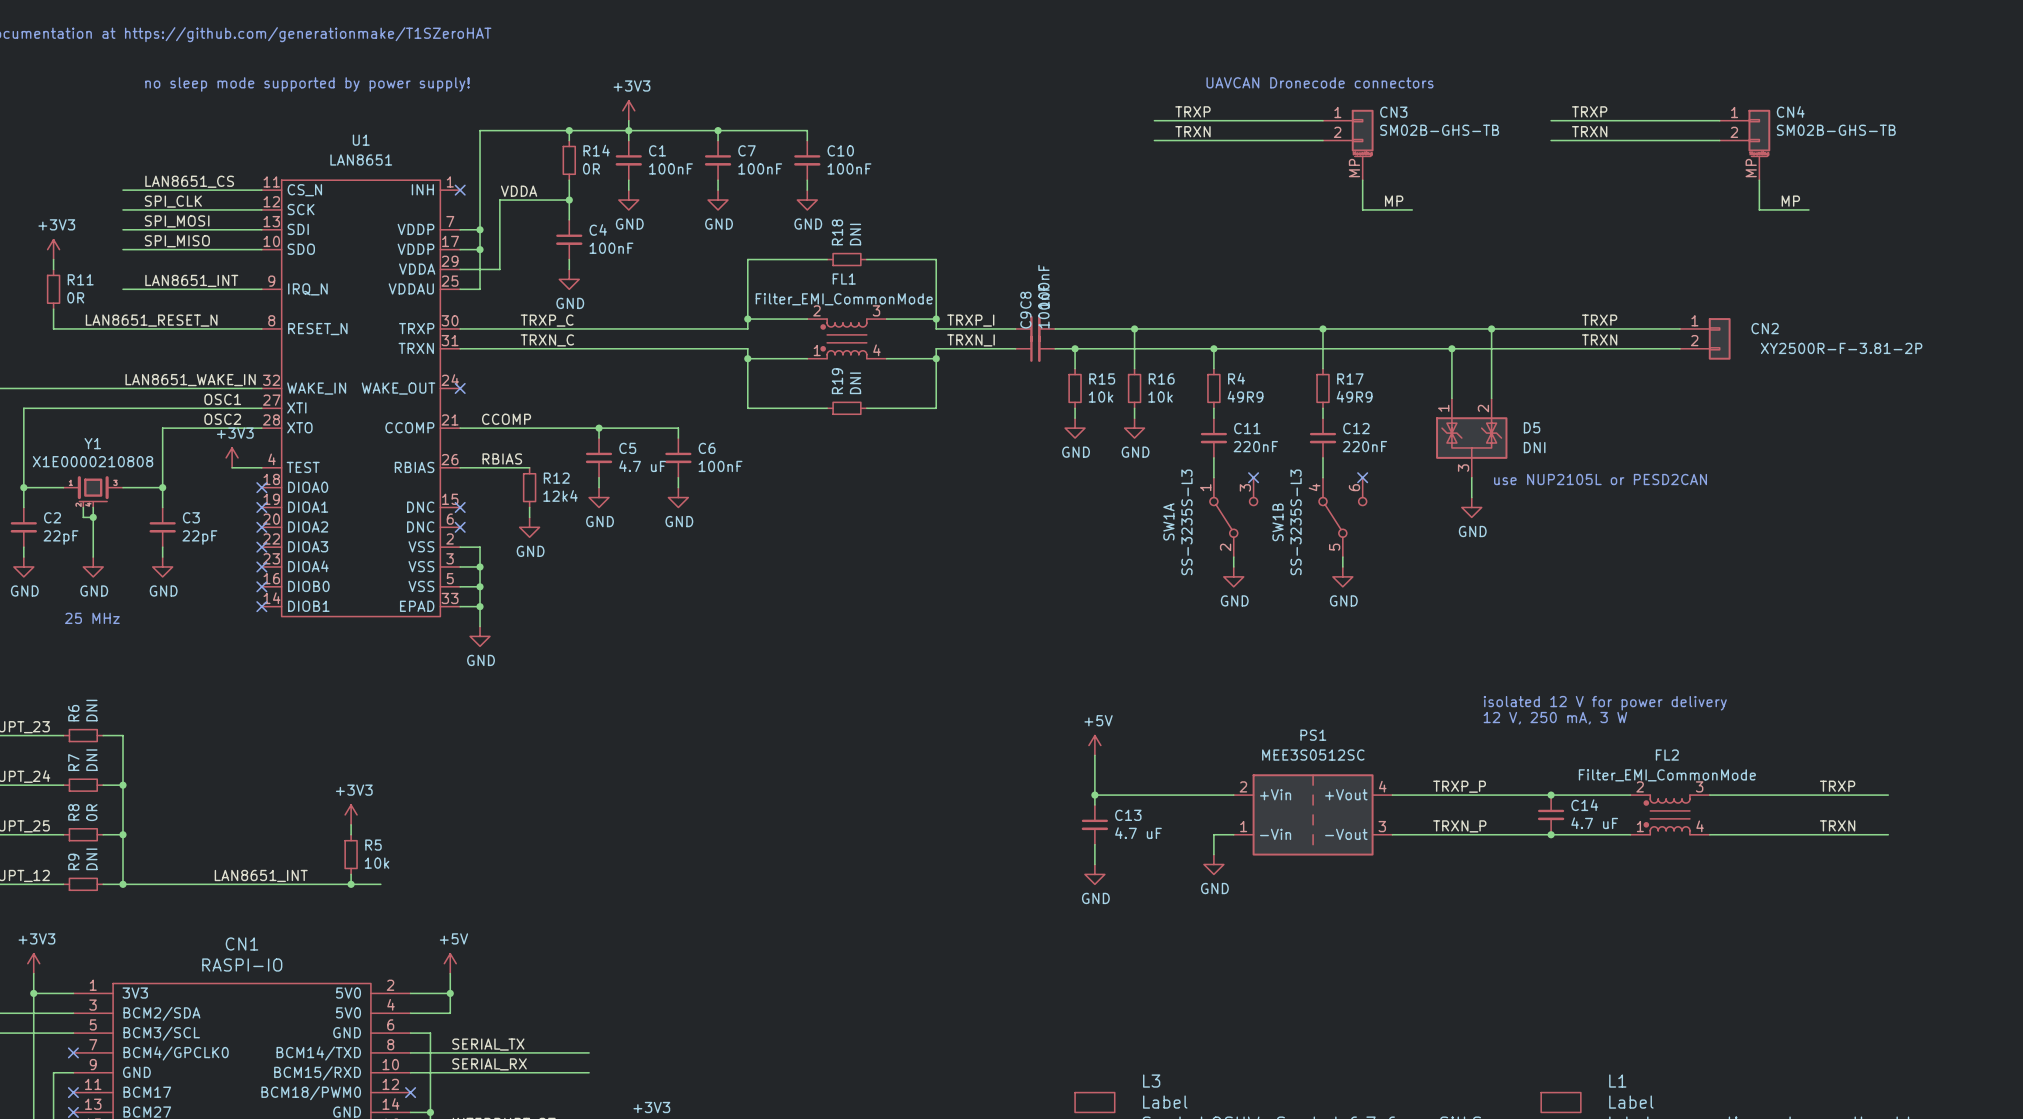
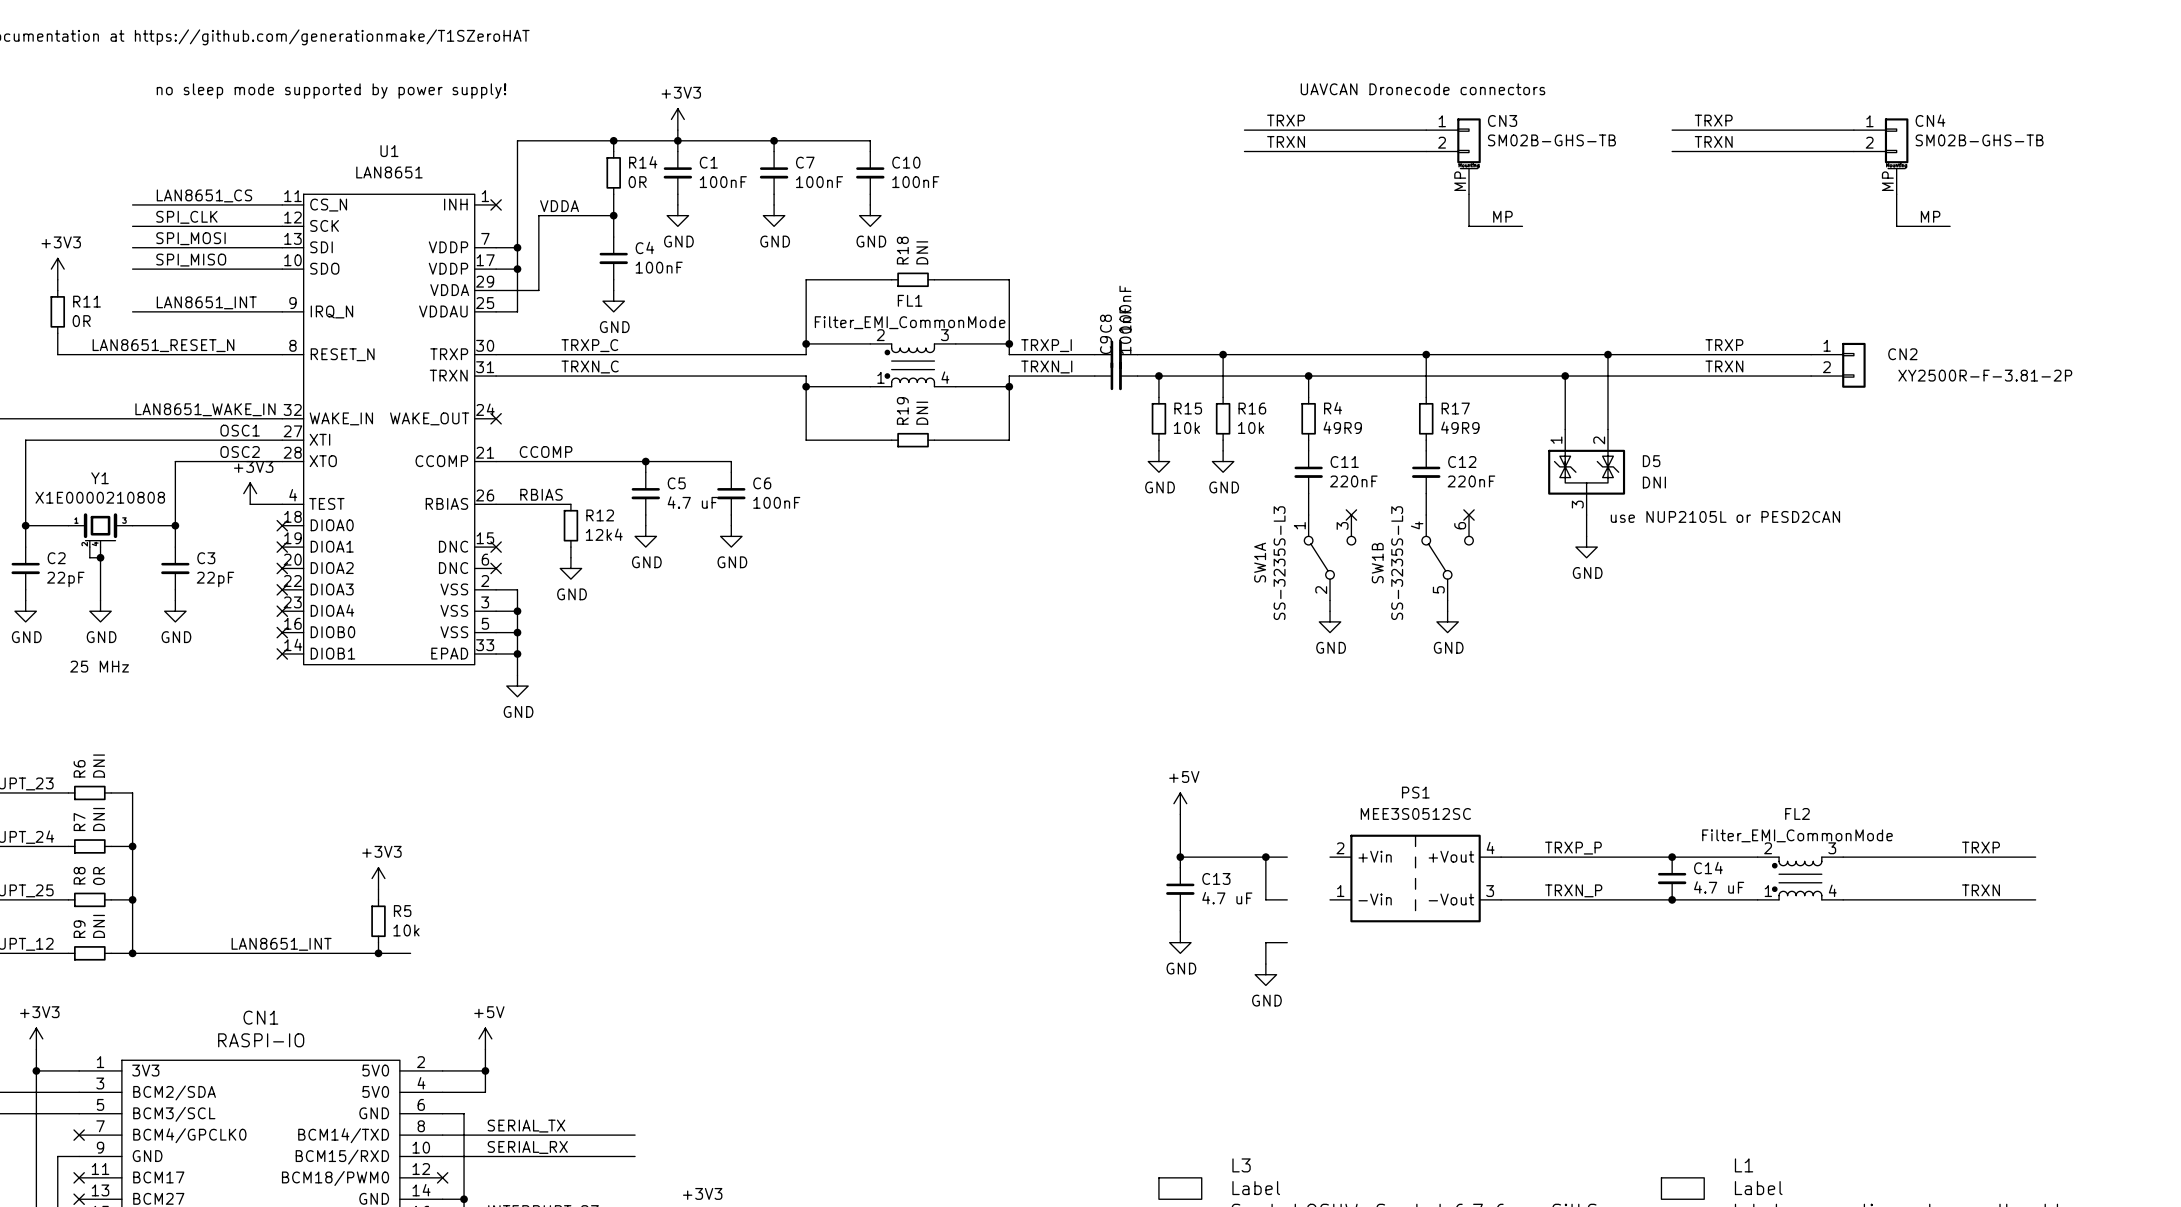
text: isolated 12 V for power delivery (1605, 703) -> none
text: 12 V, 250 mA, 3 W (1555, 718) -> none
wire: none -> (1265, 857) (1265, 899) (1287, 899)
junction: none -> (1265, 857)
wire: (1194, 795) (1233, 795) -> none
wire: (1233, 834) (1213, 834) (1213, 854) -> (1287, 942) (1265, 942) (1265, 964)
power symbol position: GND (1213, 864) -> GND (1265, 974)

